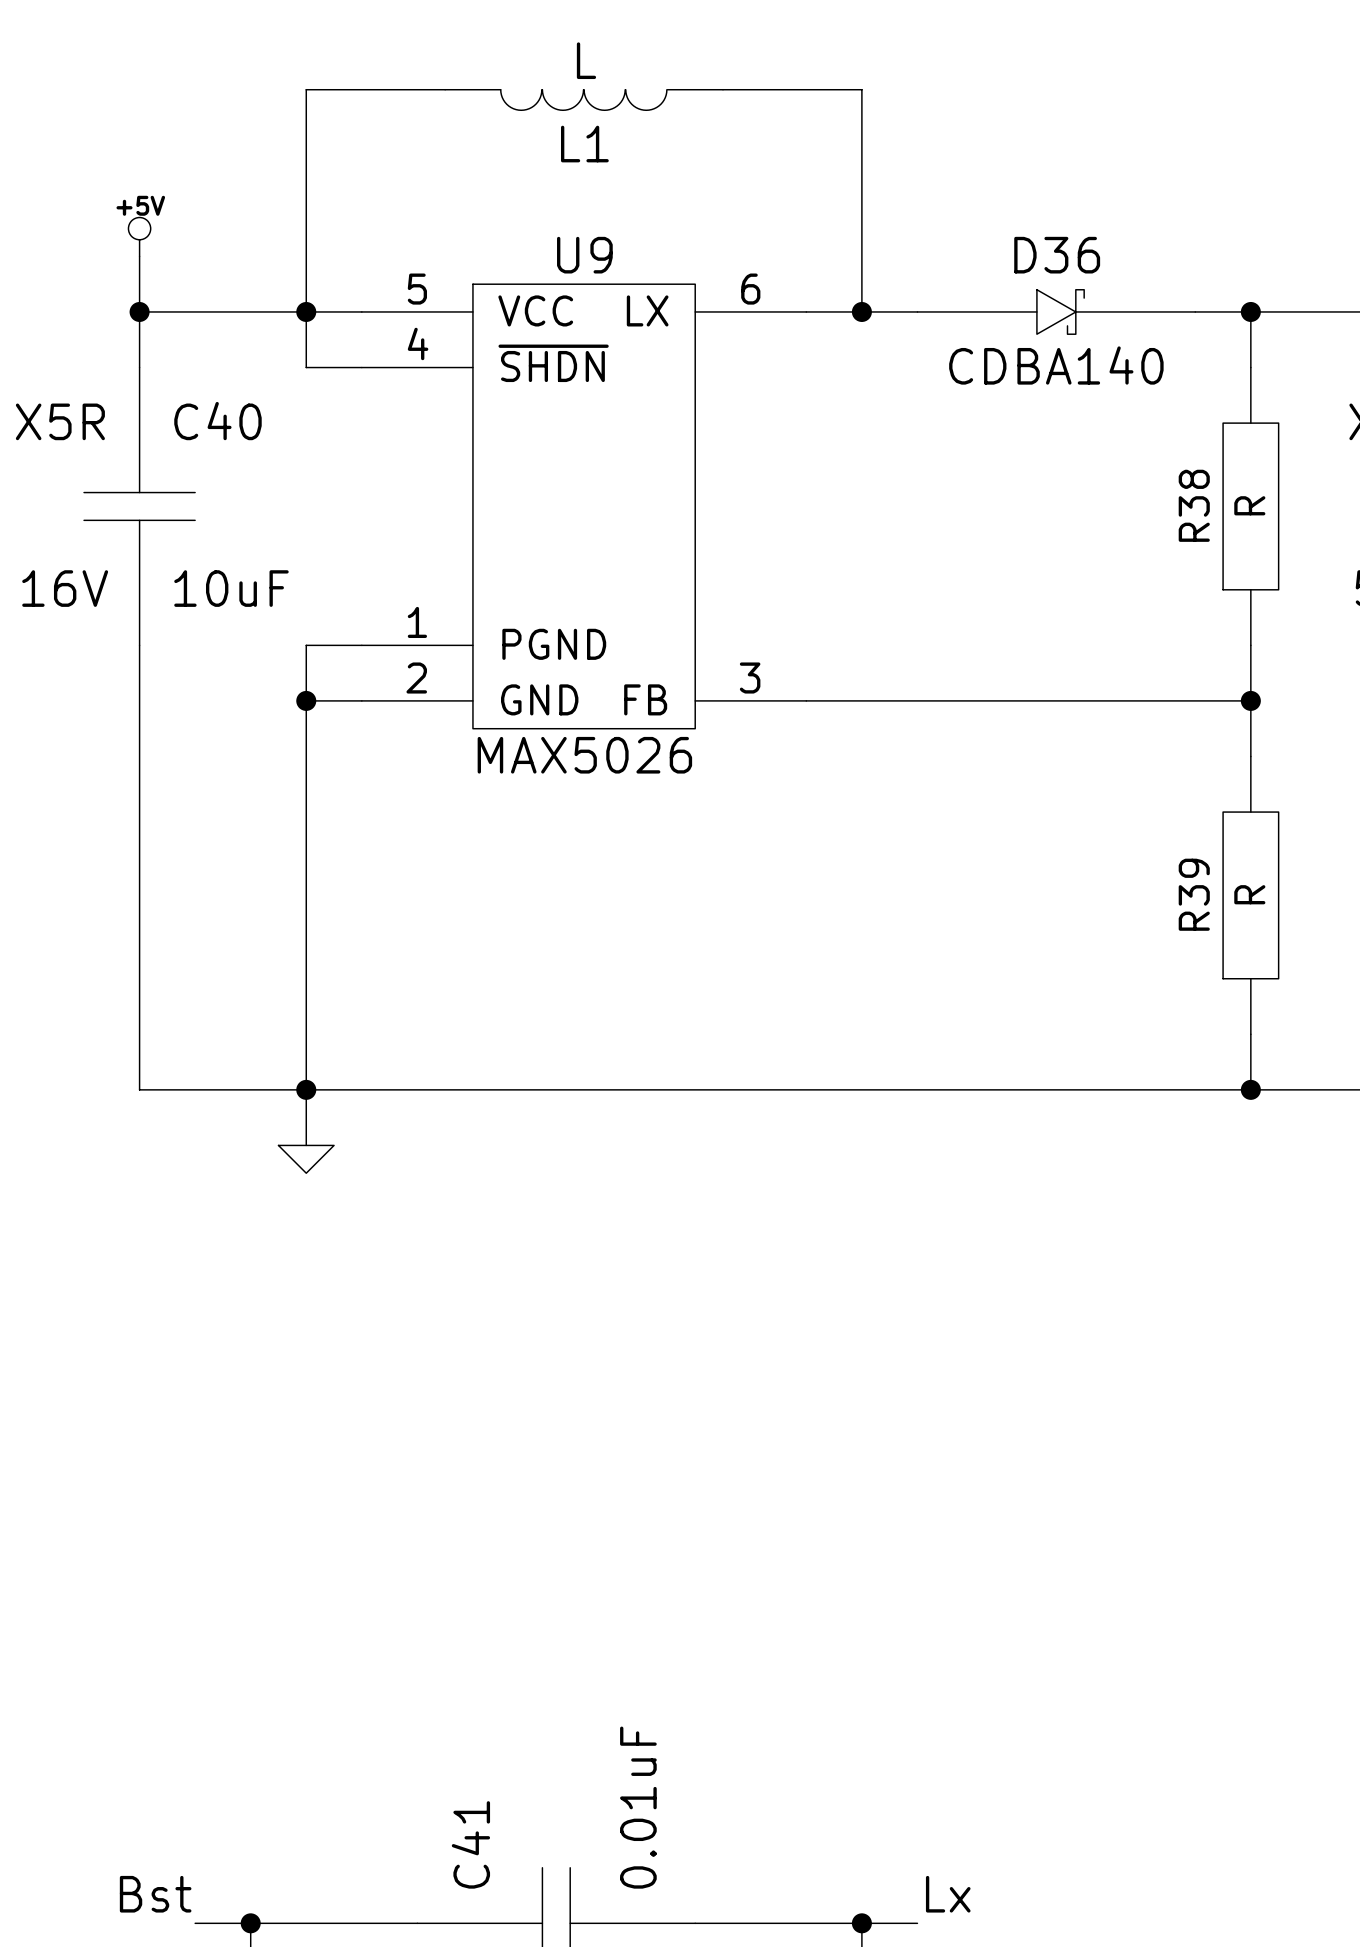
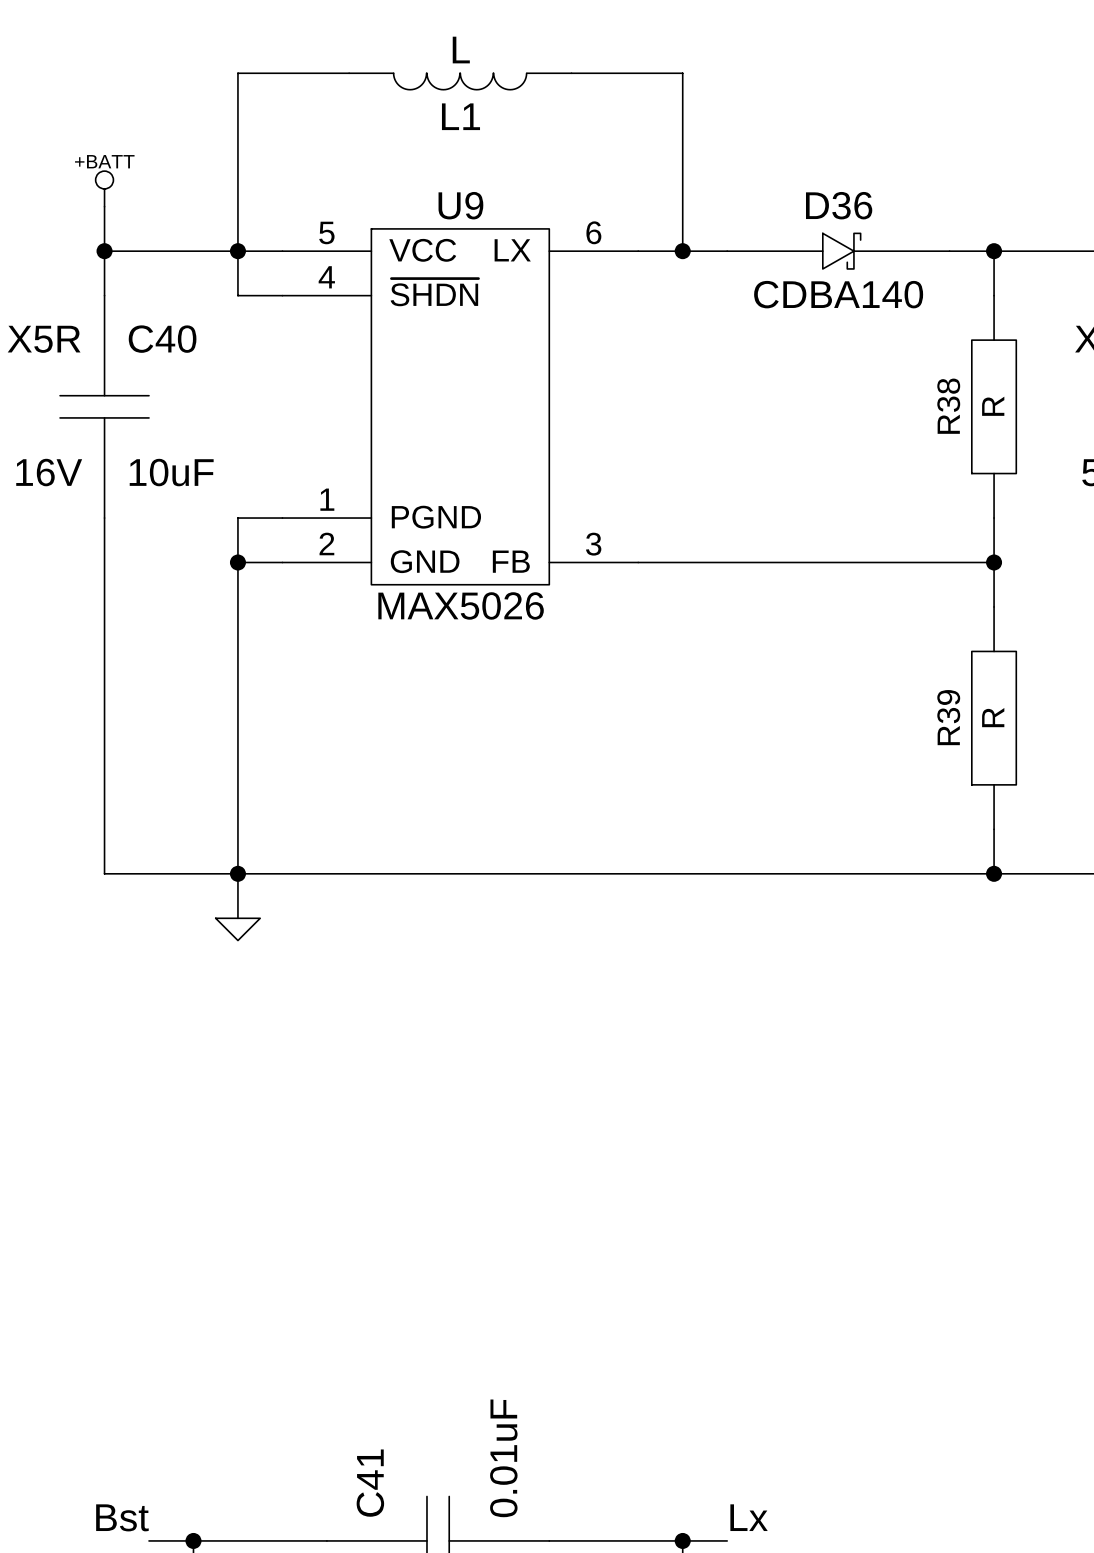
power symbol: +5V (139, 236) -> +BATT (104, 188)

